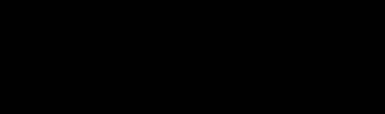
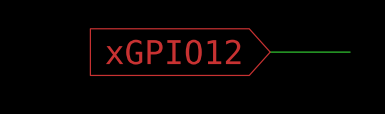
global label: none -> xGPIO12 (173, 52)
wire: none -> (270, 52) (350, 52)

